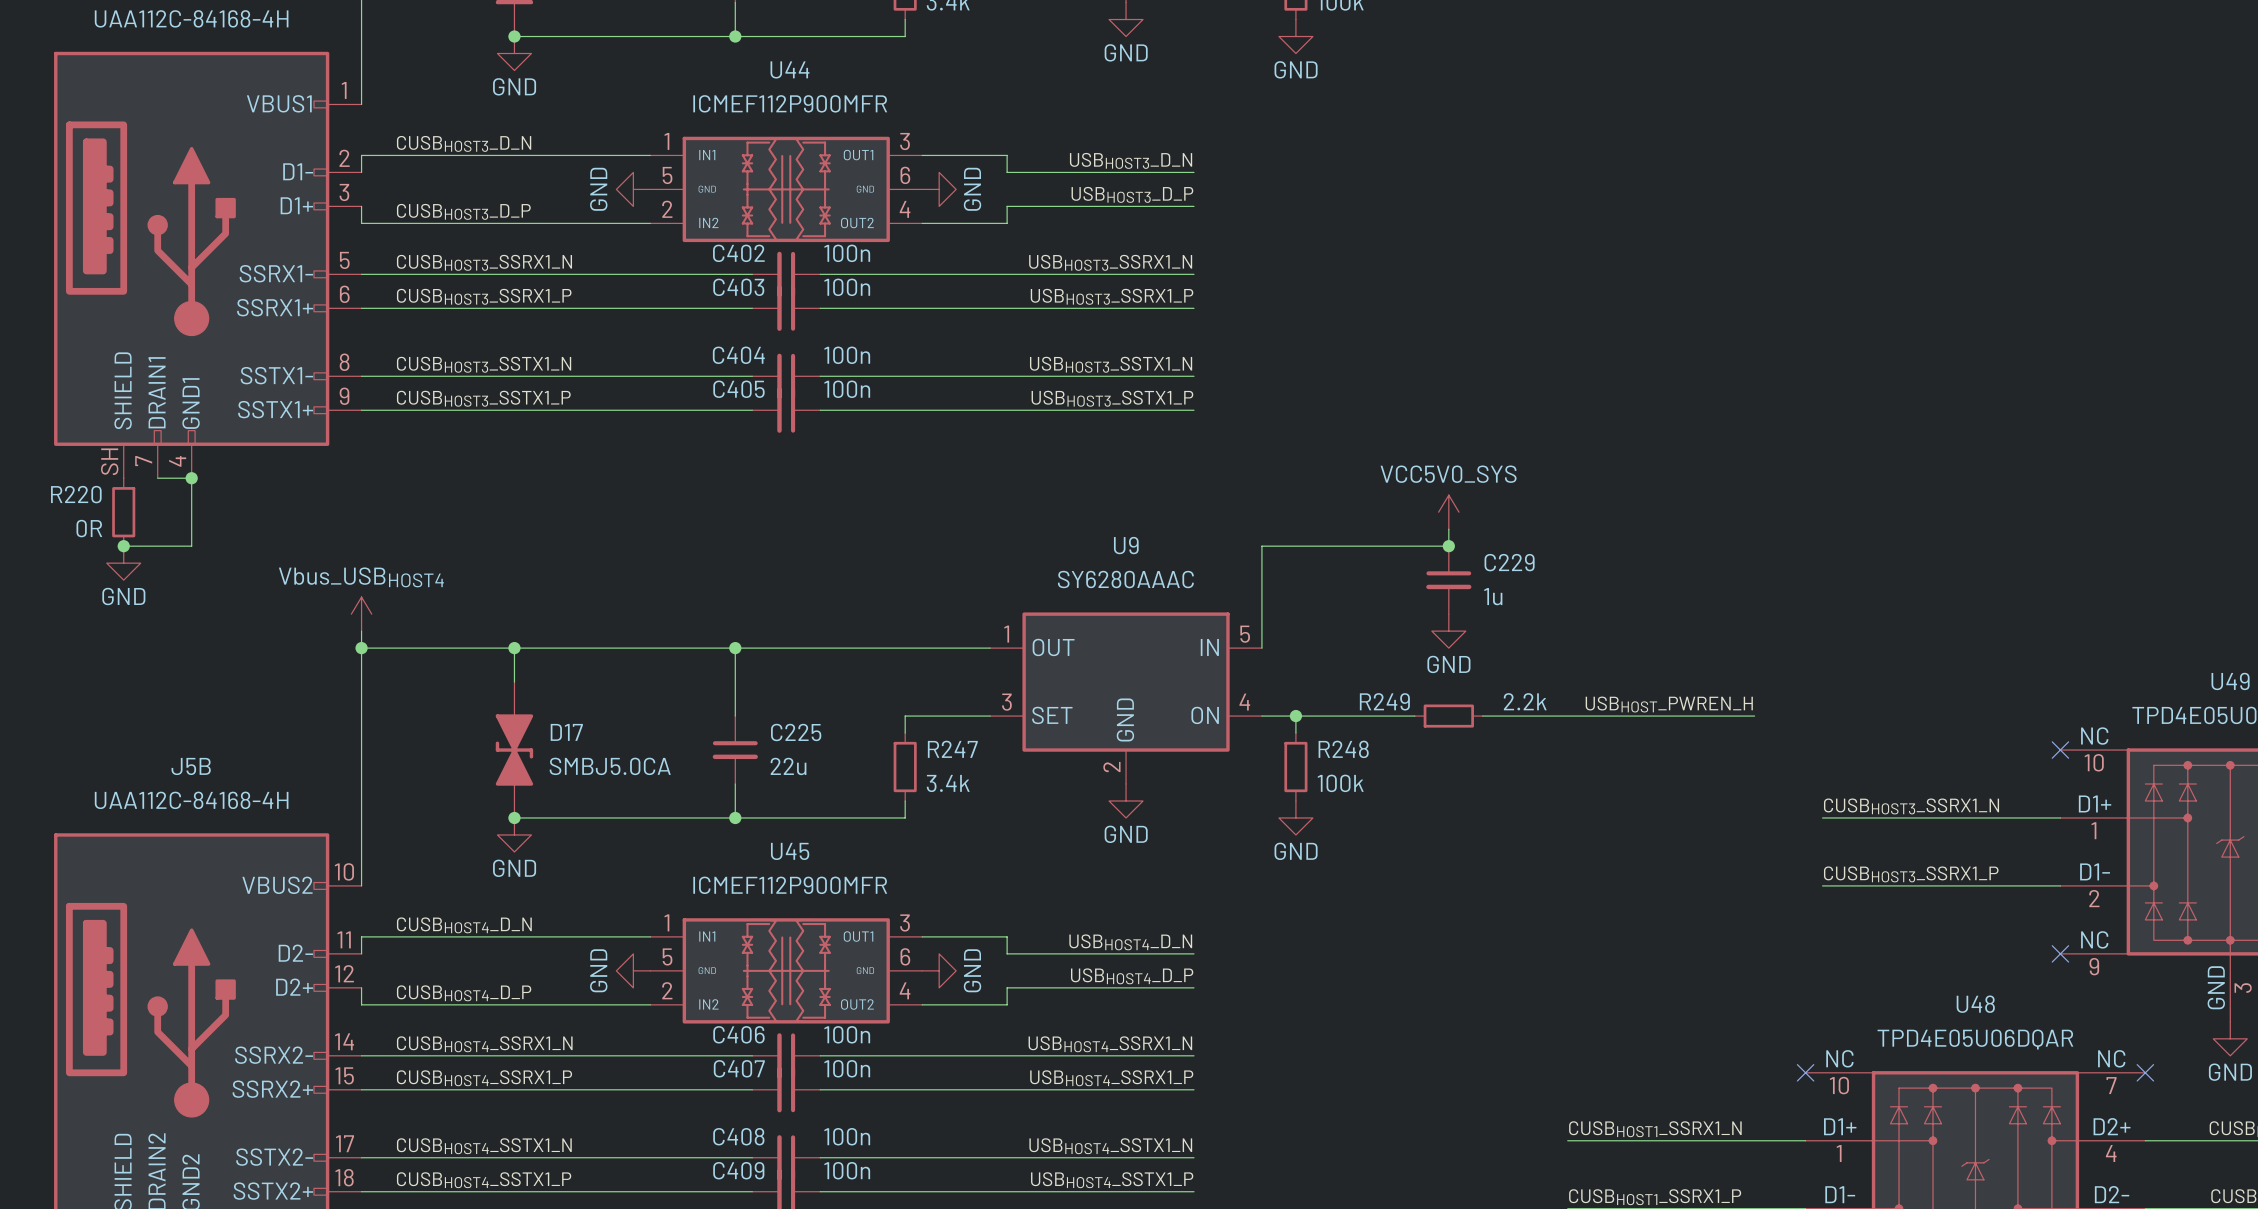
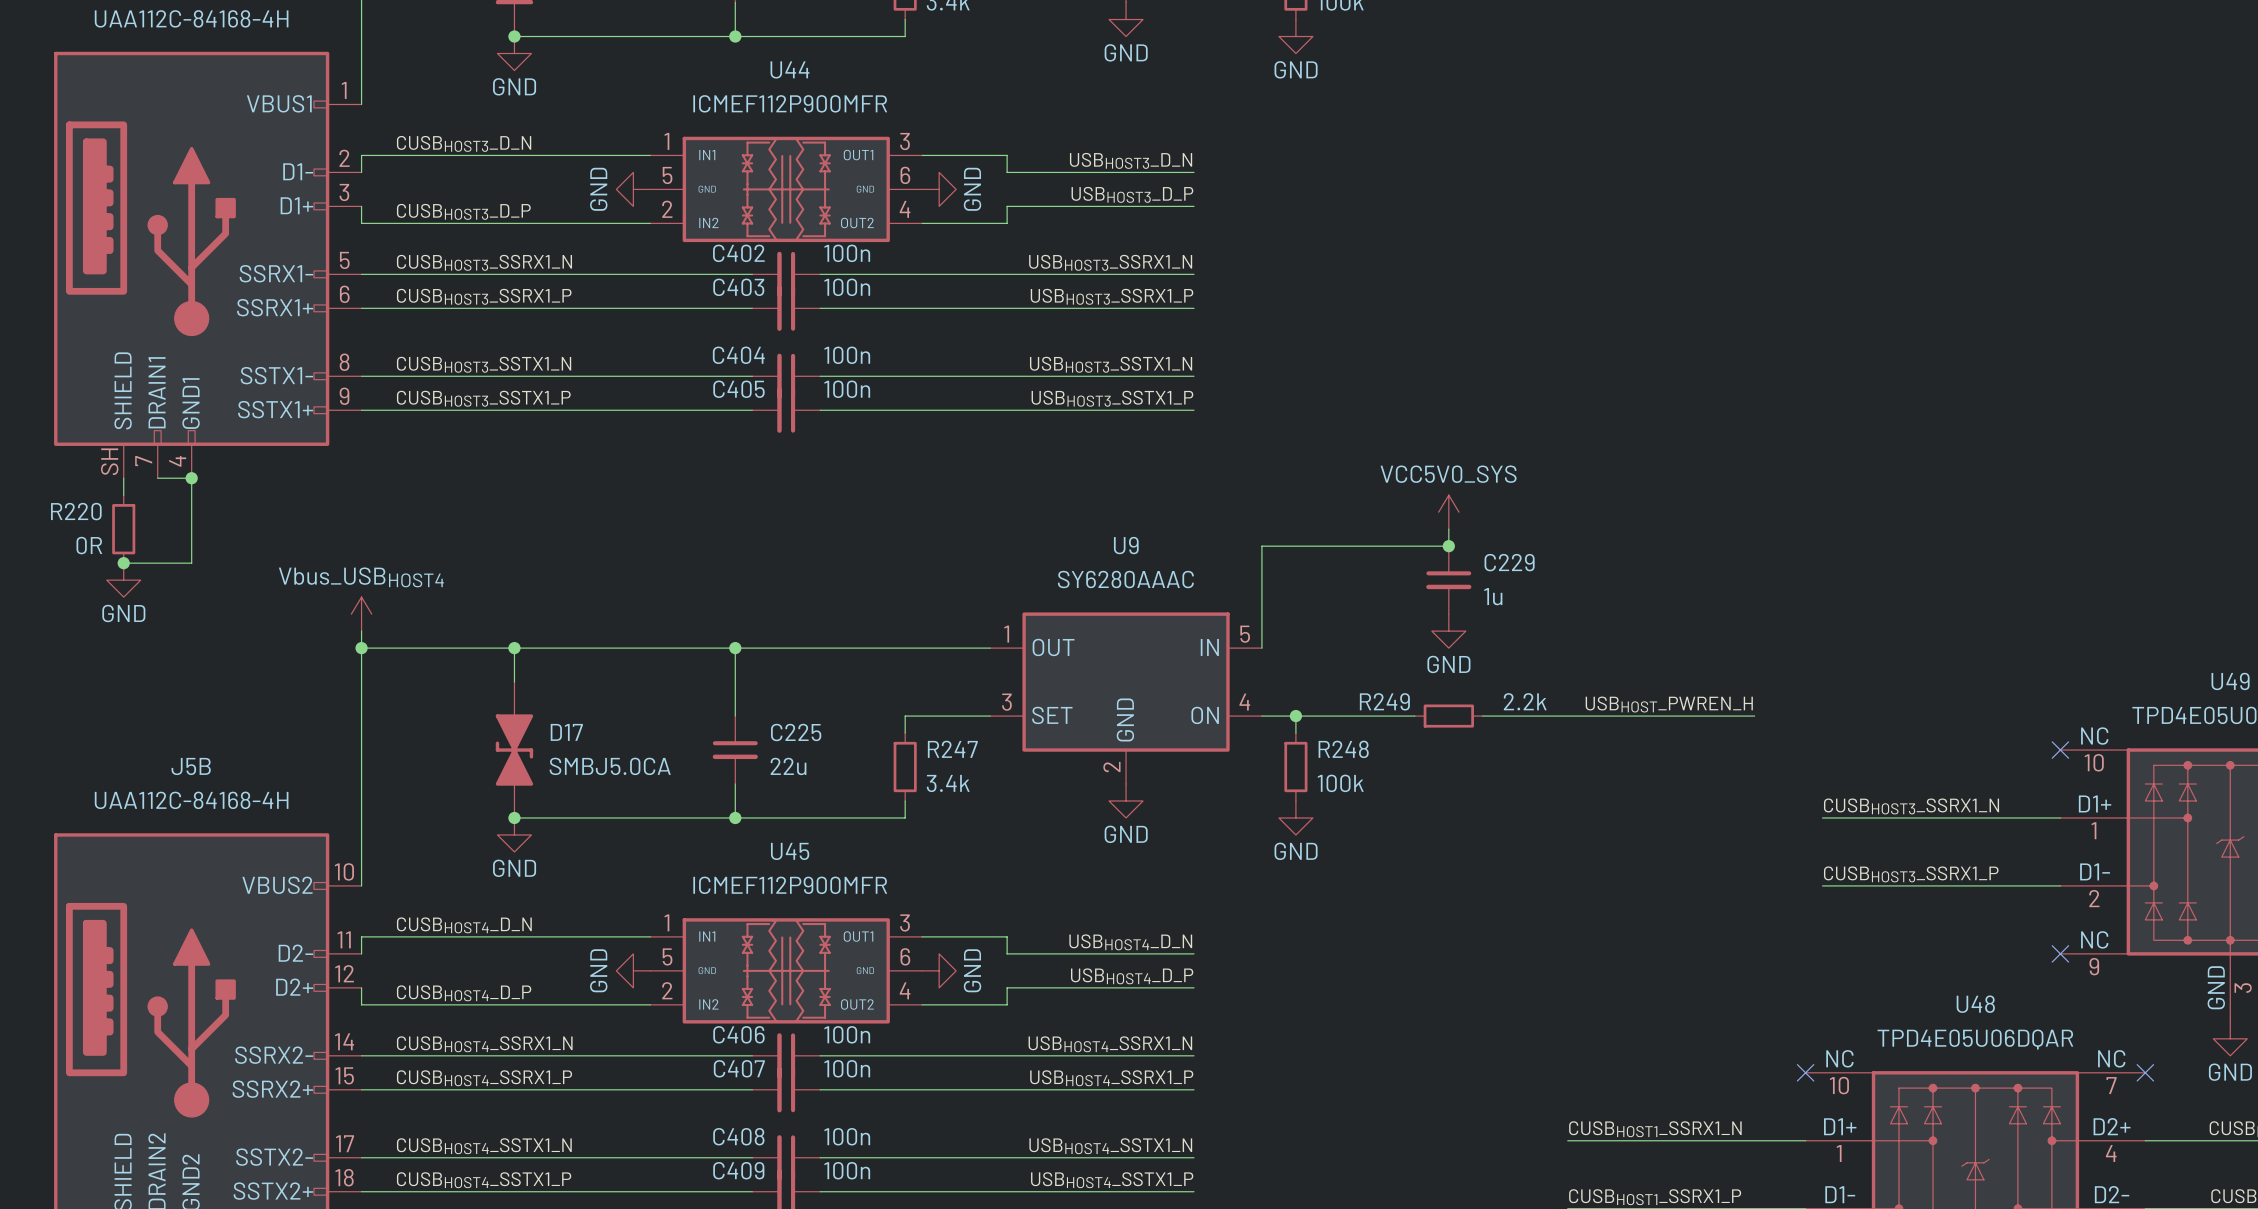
R220 position: (123, 512) -> (123, 529)
wire: (123, 546) (191, 546) -> (123, 563) (191, 563) (191, 546)
junction position: (123, 546) -> (123, 563)
power symbol position: GND (123, 563) -> GND (123, 580)

